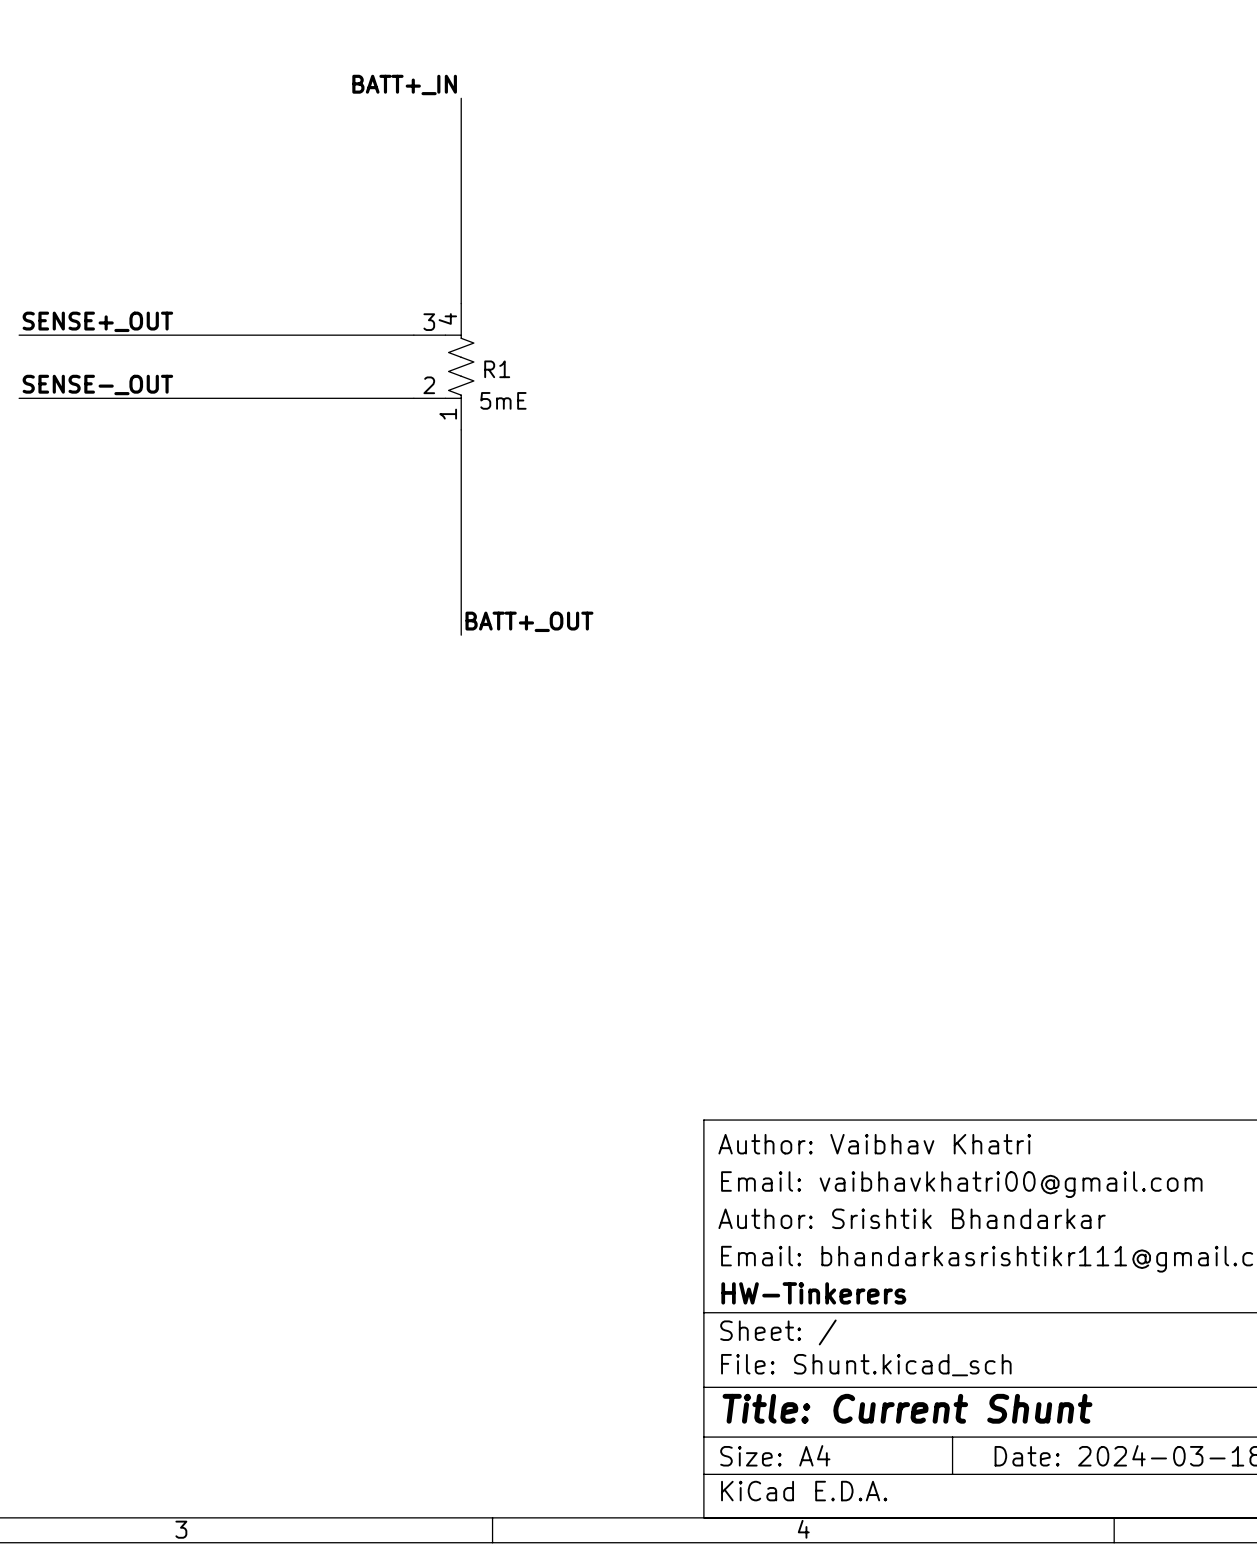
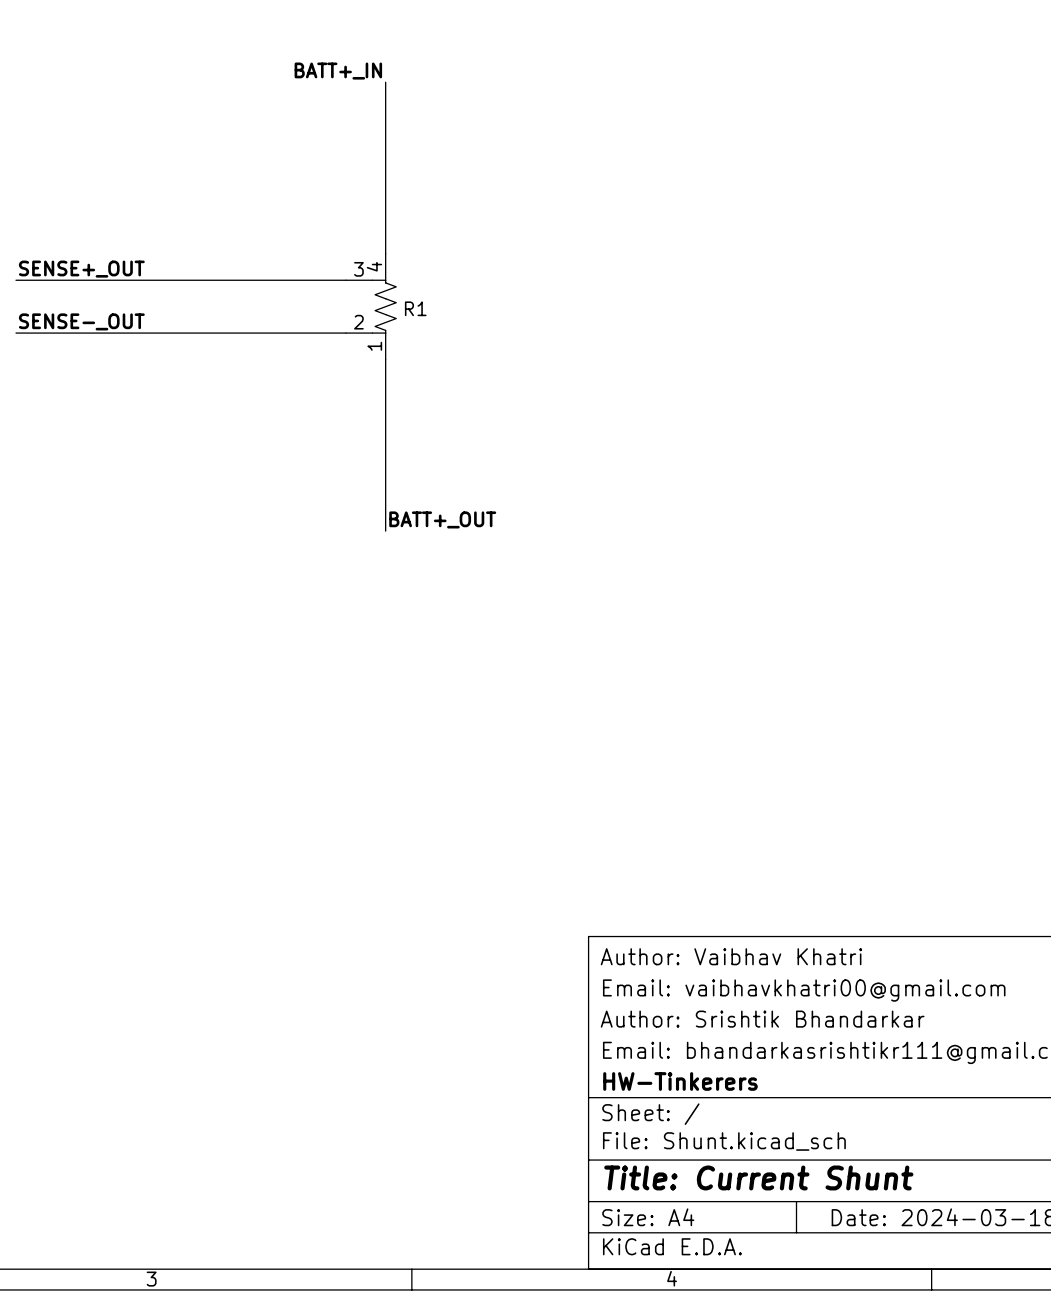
R1 value: 5mE (503, 400) -> none

